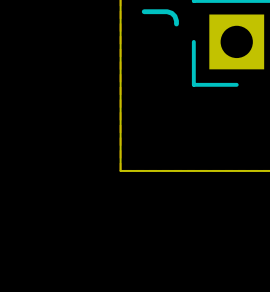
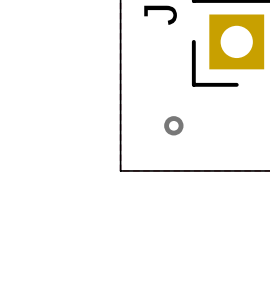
via: none -> (173, 125)

